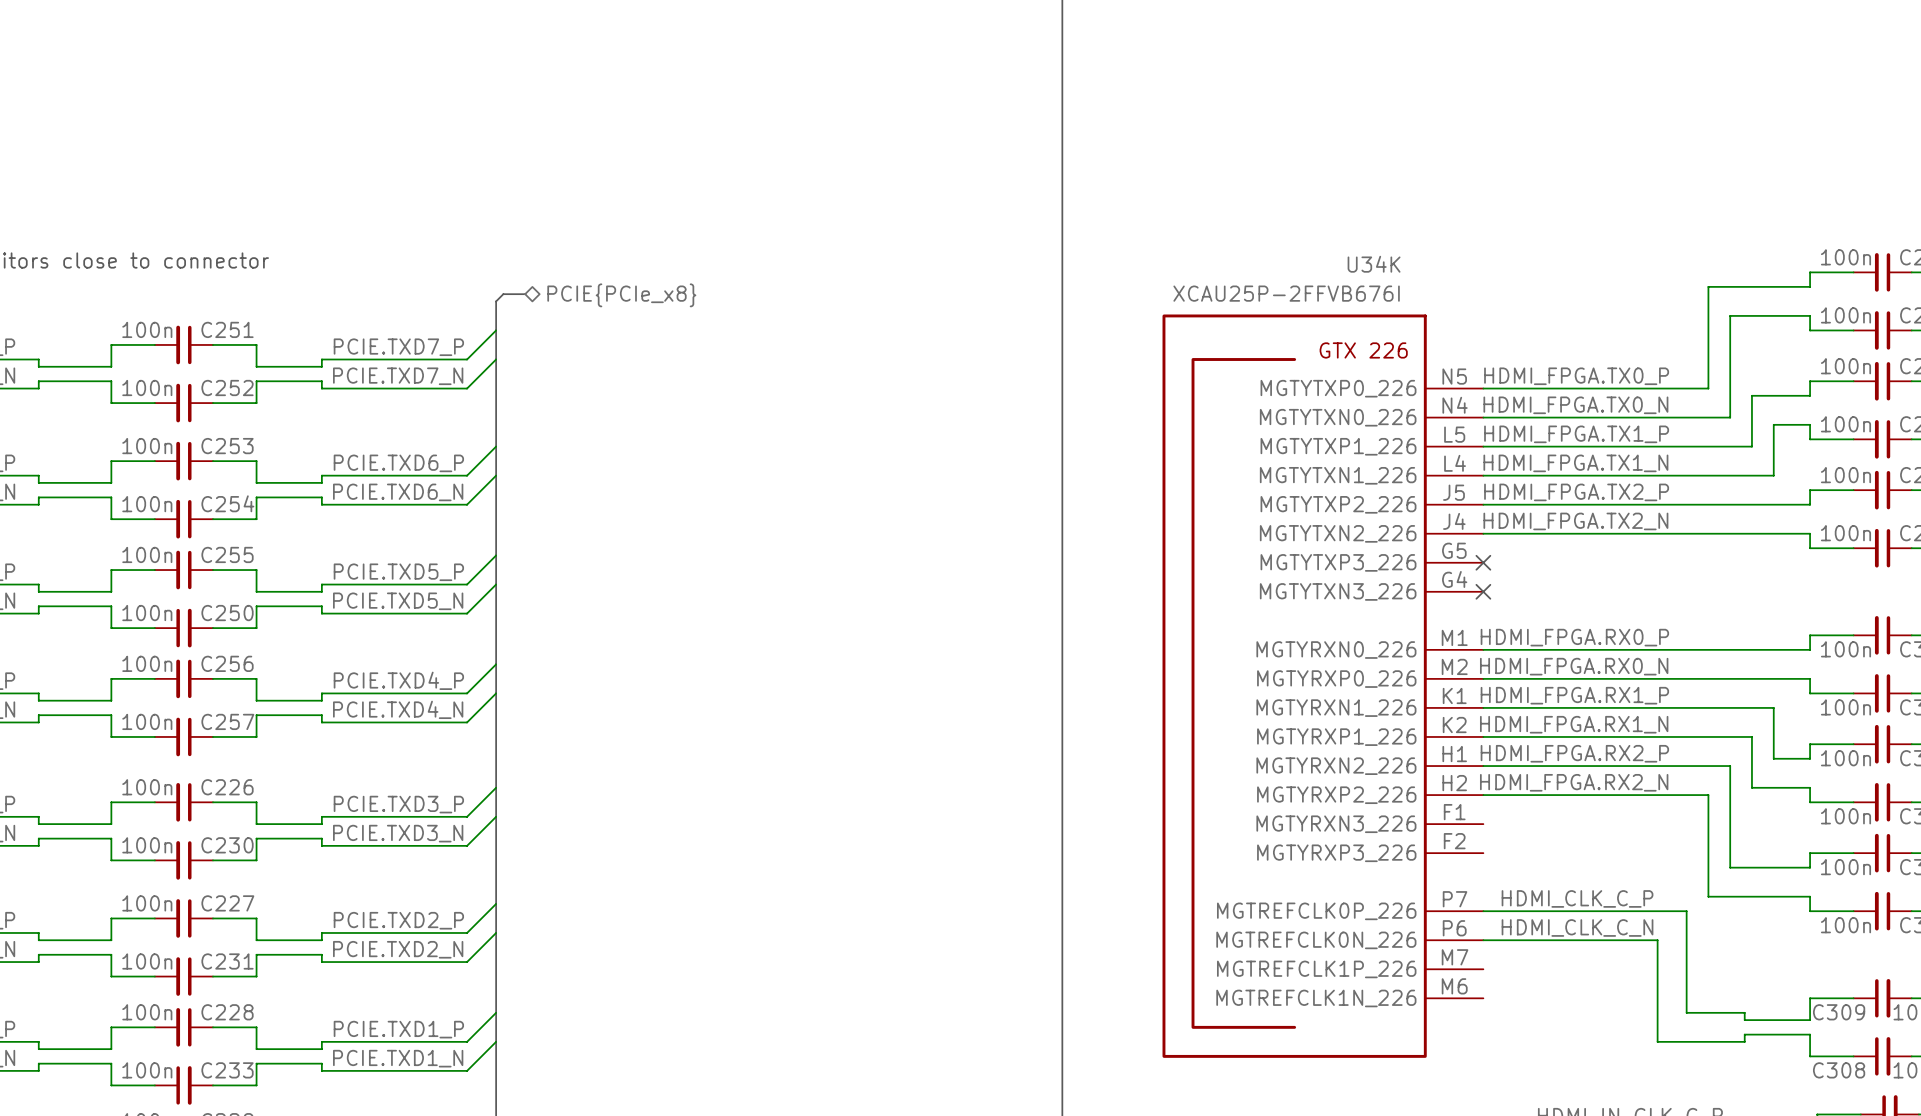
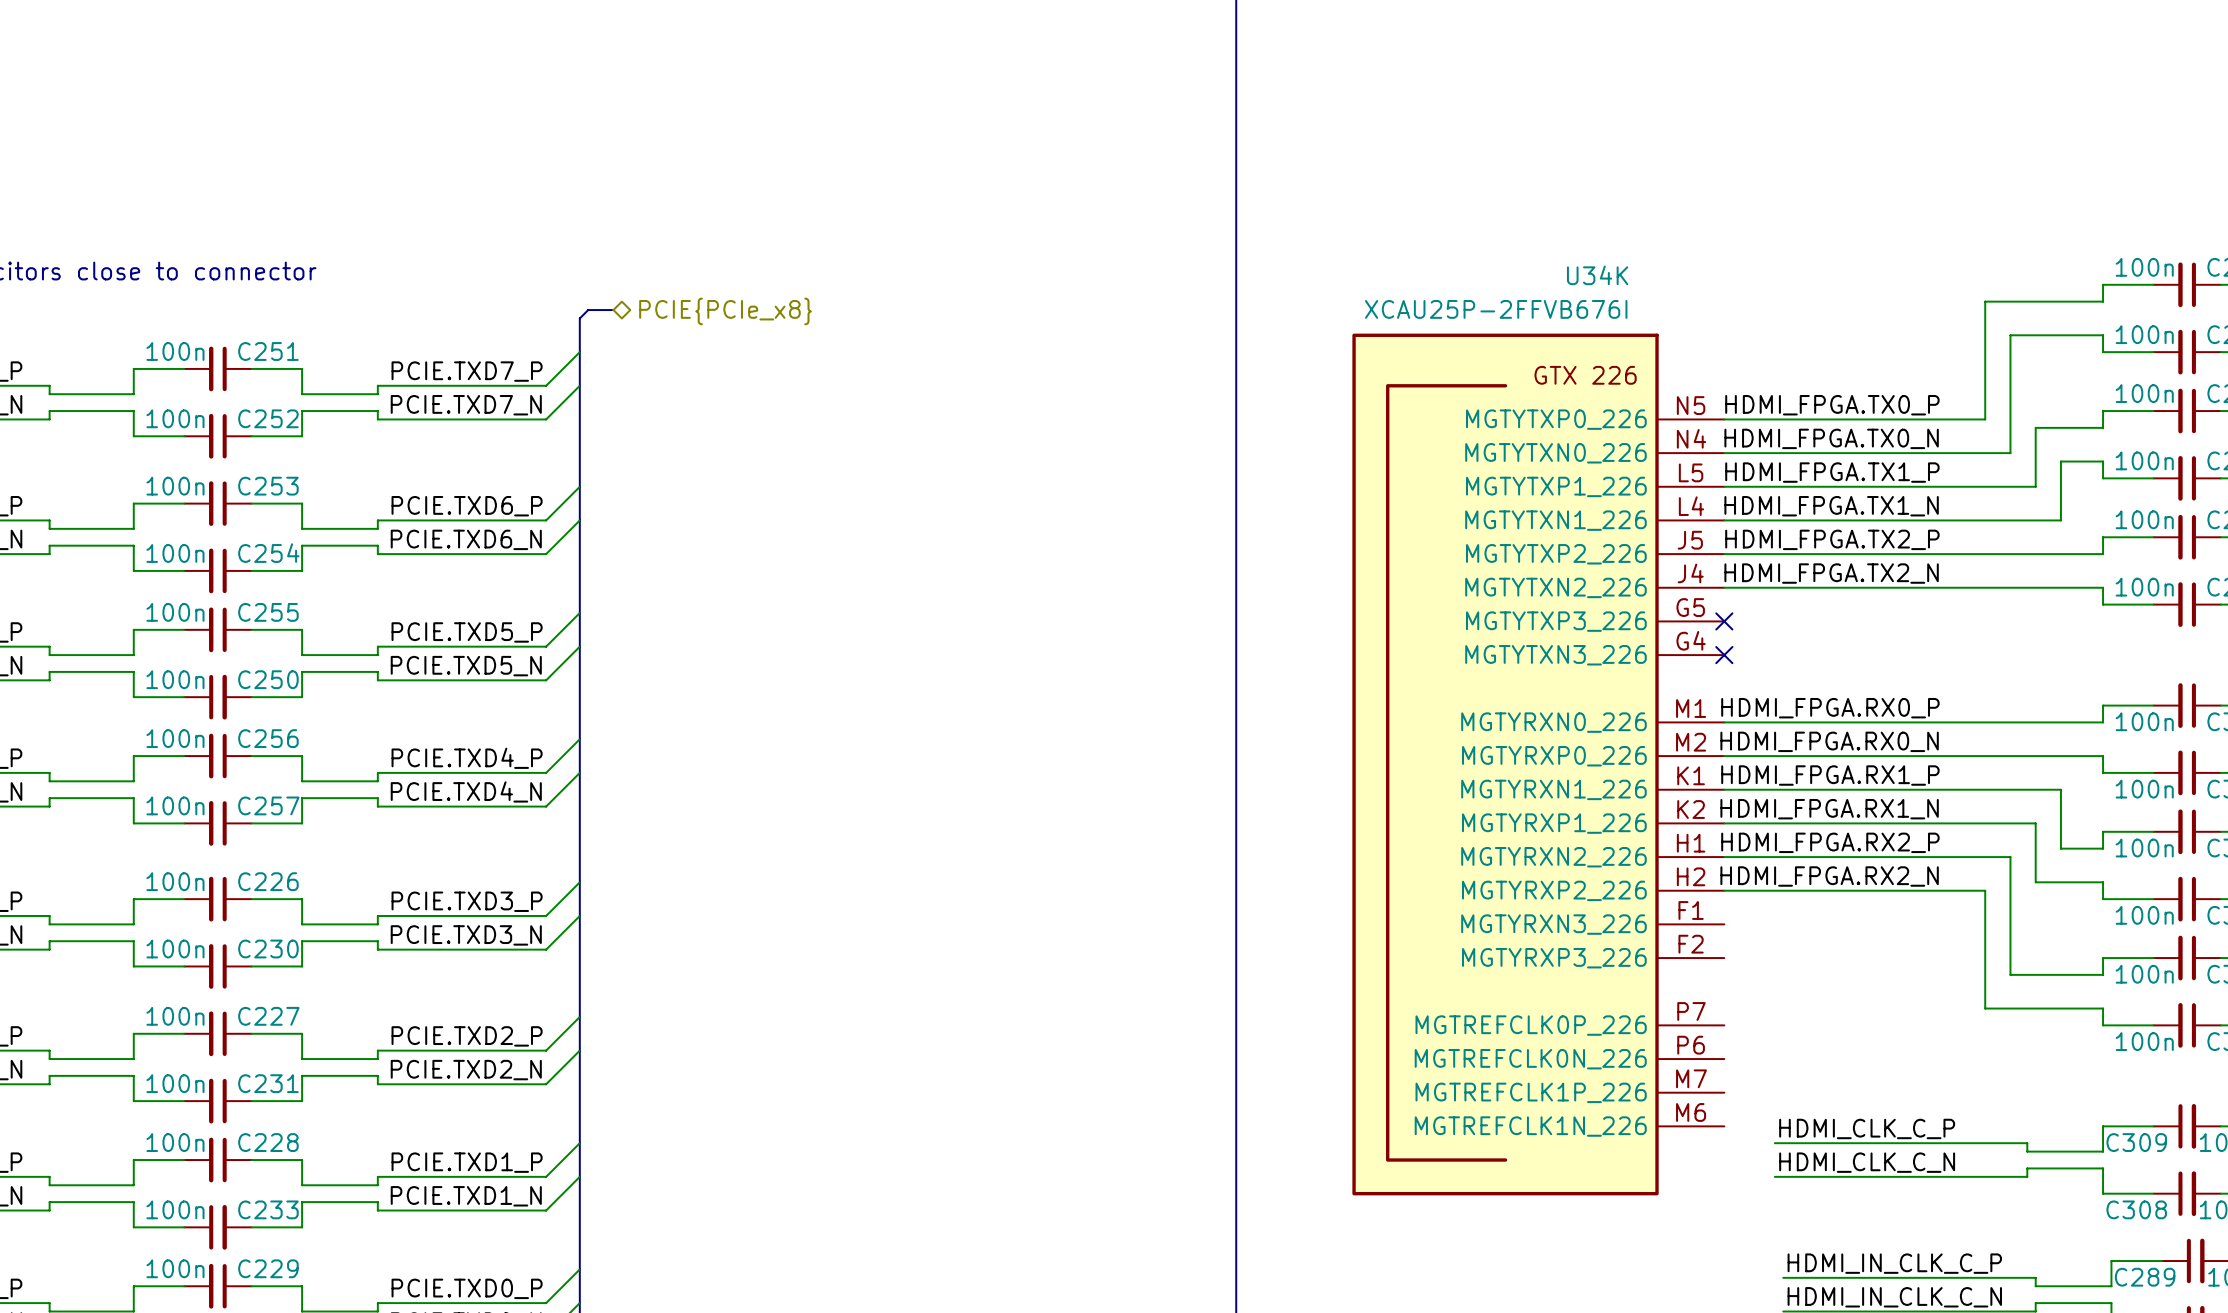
label position: HDMI_CLK_C_P (1577, 898) -> HDMI_CLK_C_P (1867, 1128)
wire: (1483, 911) (1686, 911) (1686, 1012) -> (1774, 1143) (1959, 1143)
label position: HDMI_CLK_C_N (1577, 927) -> HDMI_CLK_C_N (1867, 1162)
wire: (1483, 940) (1657, 940) (1657, 1041) -> (1774, 1176) (1926, 1176)

